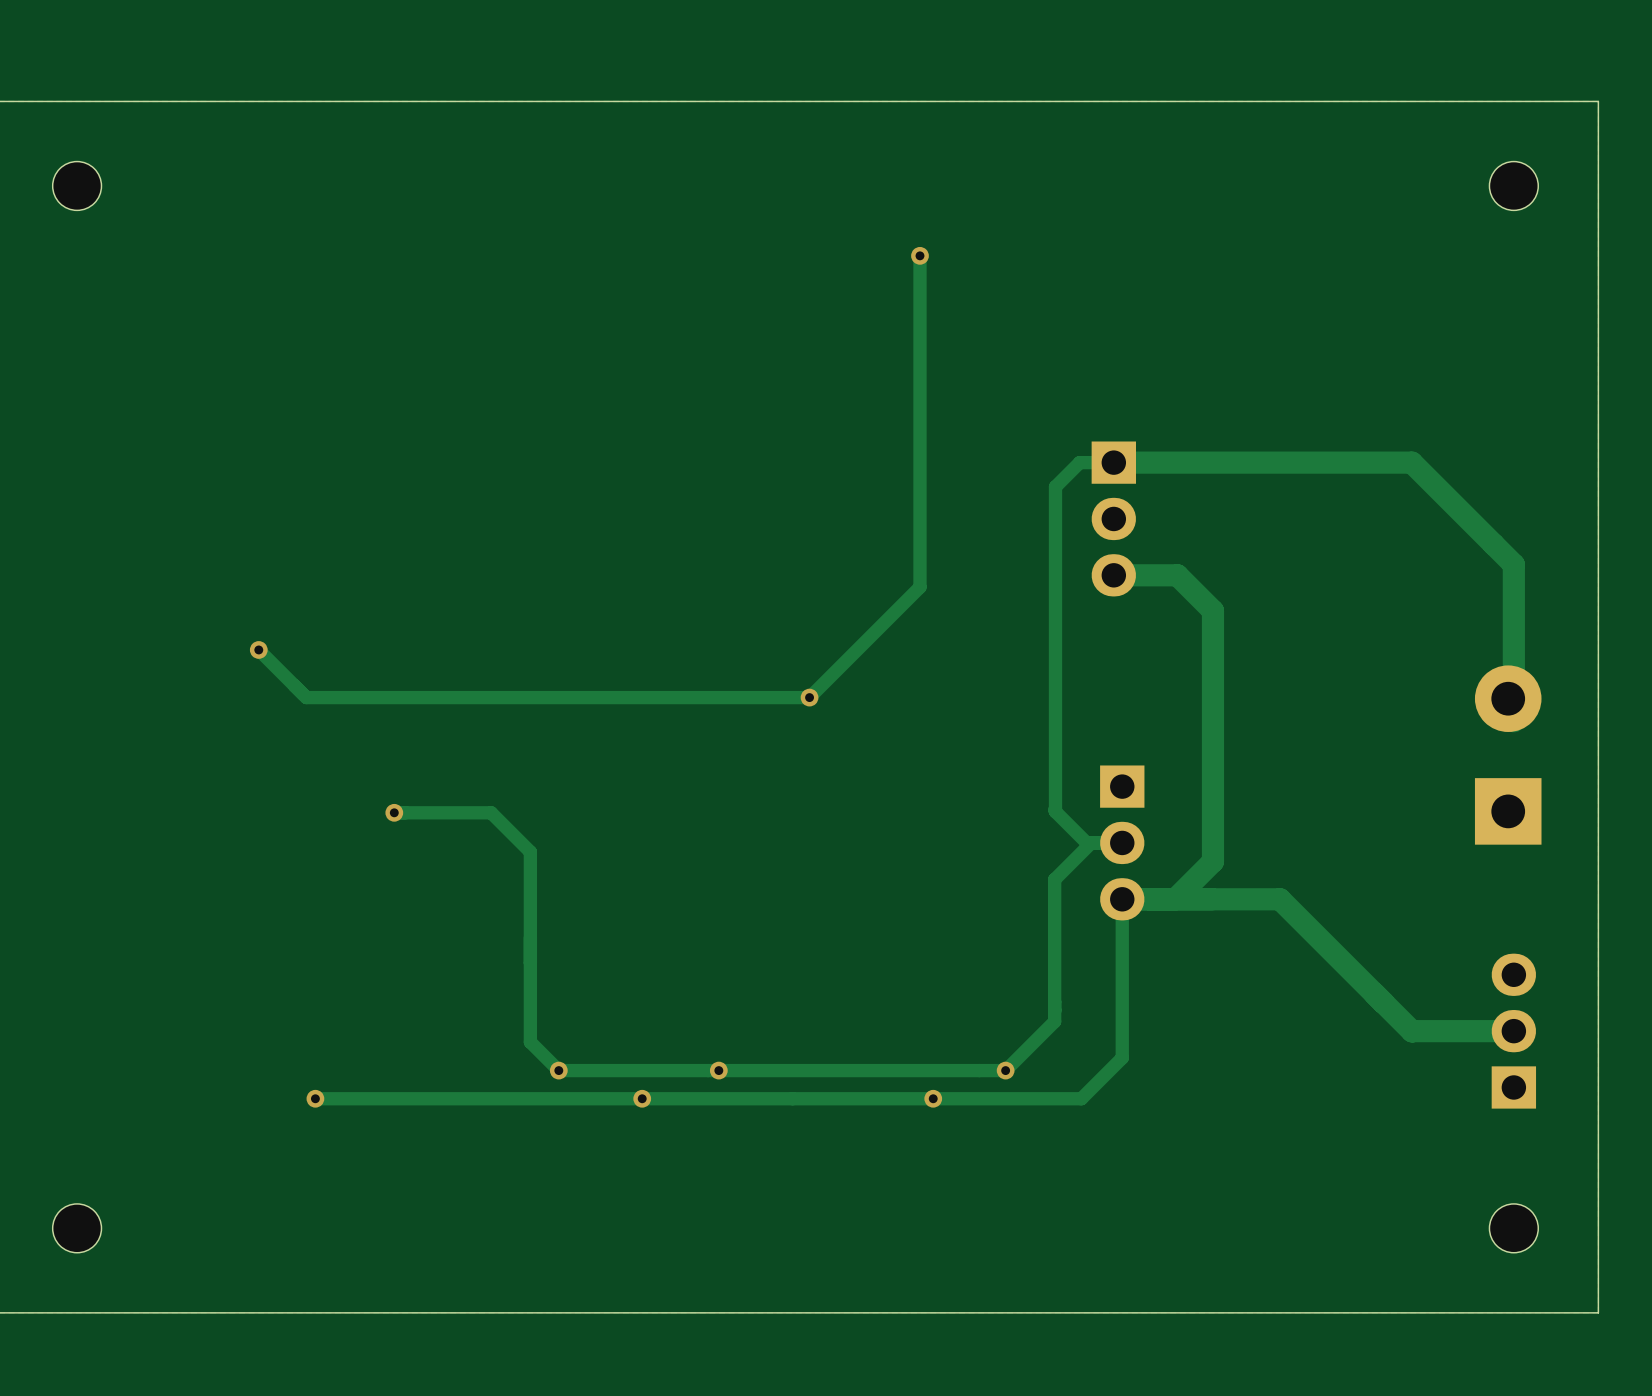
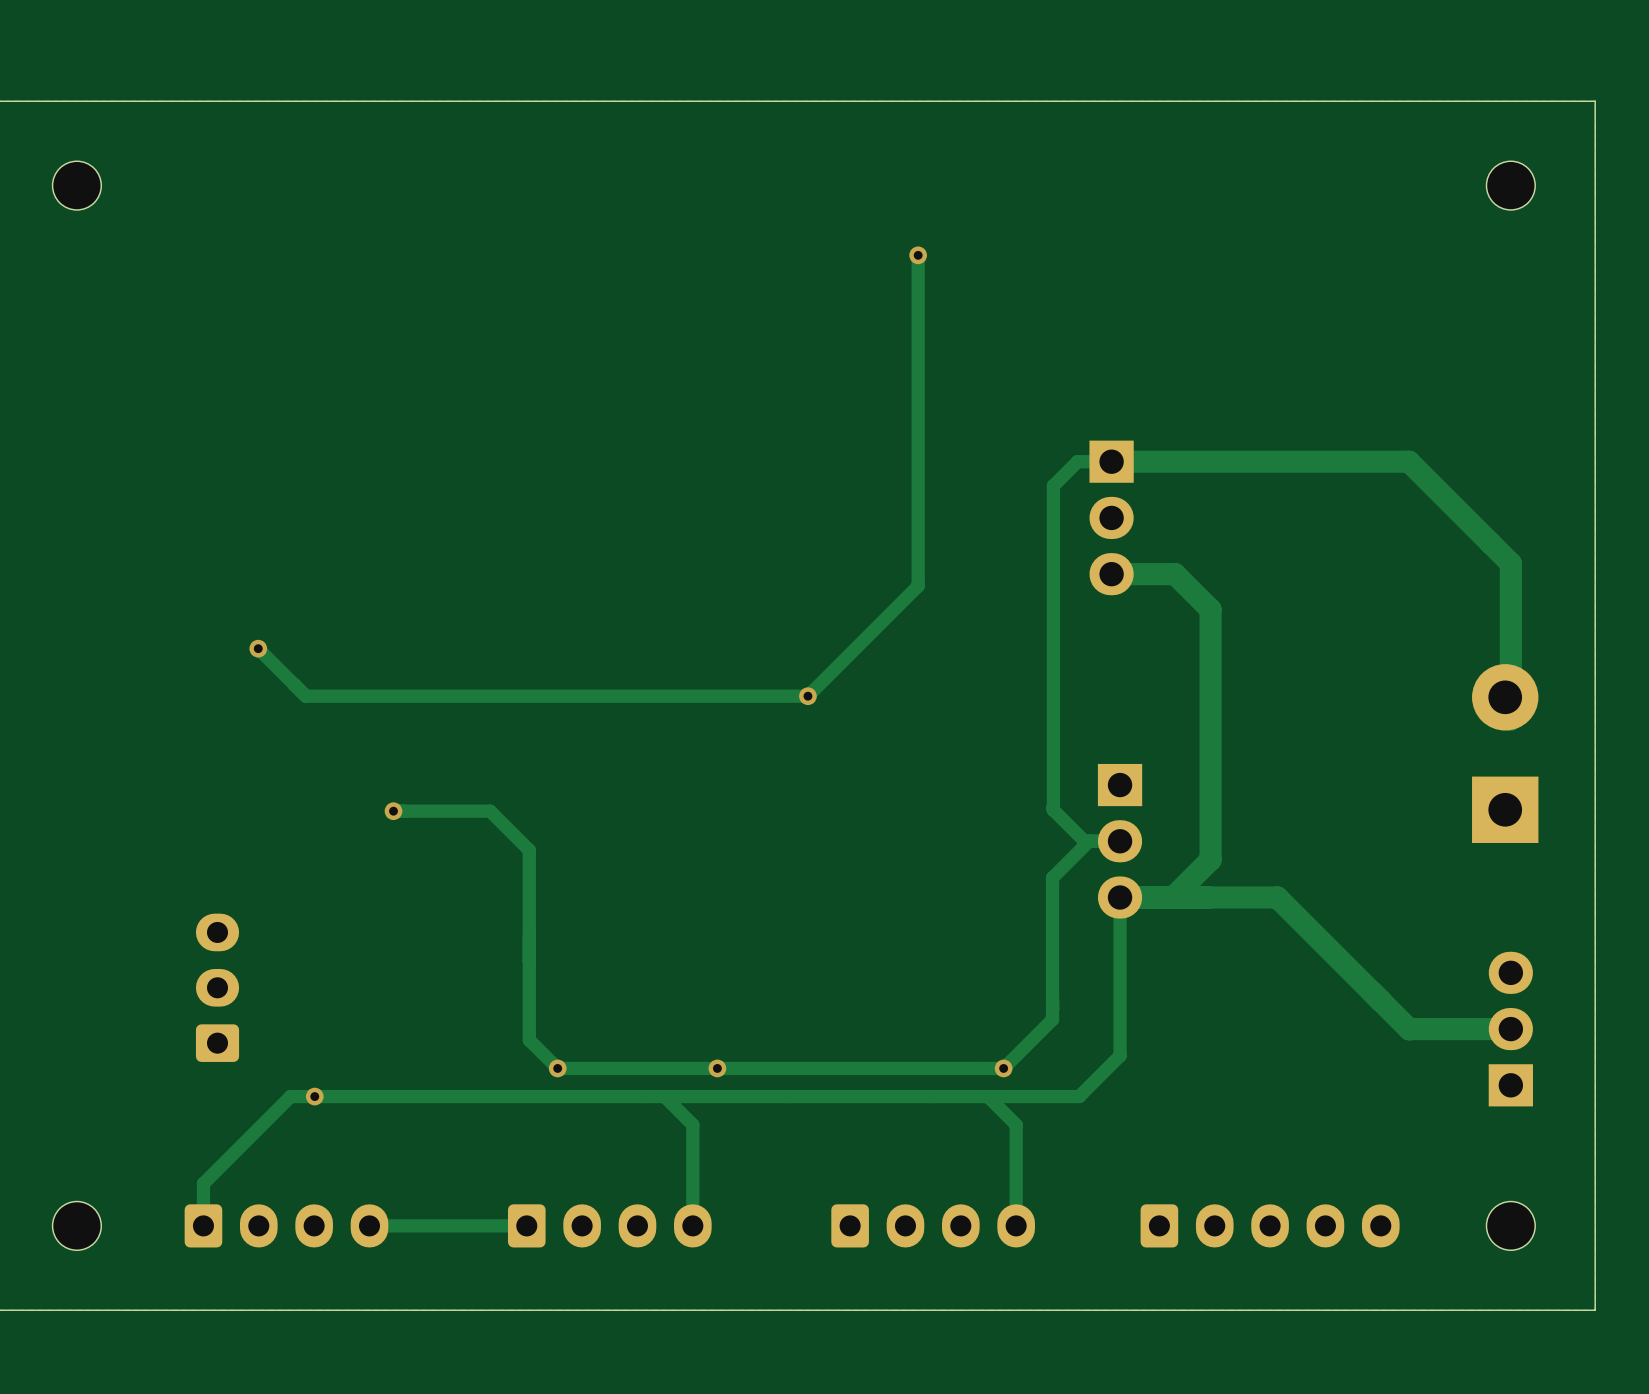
part: none -> (217, 987)
track: none -> (314, 1096) (290, 1096) (203, 1183) (203, 1225)
via: (642, 1098) -> none
track: none -> (664, 1096) (692, 1124) (692, 1225)
via: (933, 1098) -> none
track: none -> (987, 1096) (1016, 1124) (1016, 1225)
part: none -> (286, 1225)
track: none -> (526, 1225) (369, 1225)
part: none -> (609, 1225)
part: none -> (933, 1225)
part: none -> (1270, 1225)

